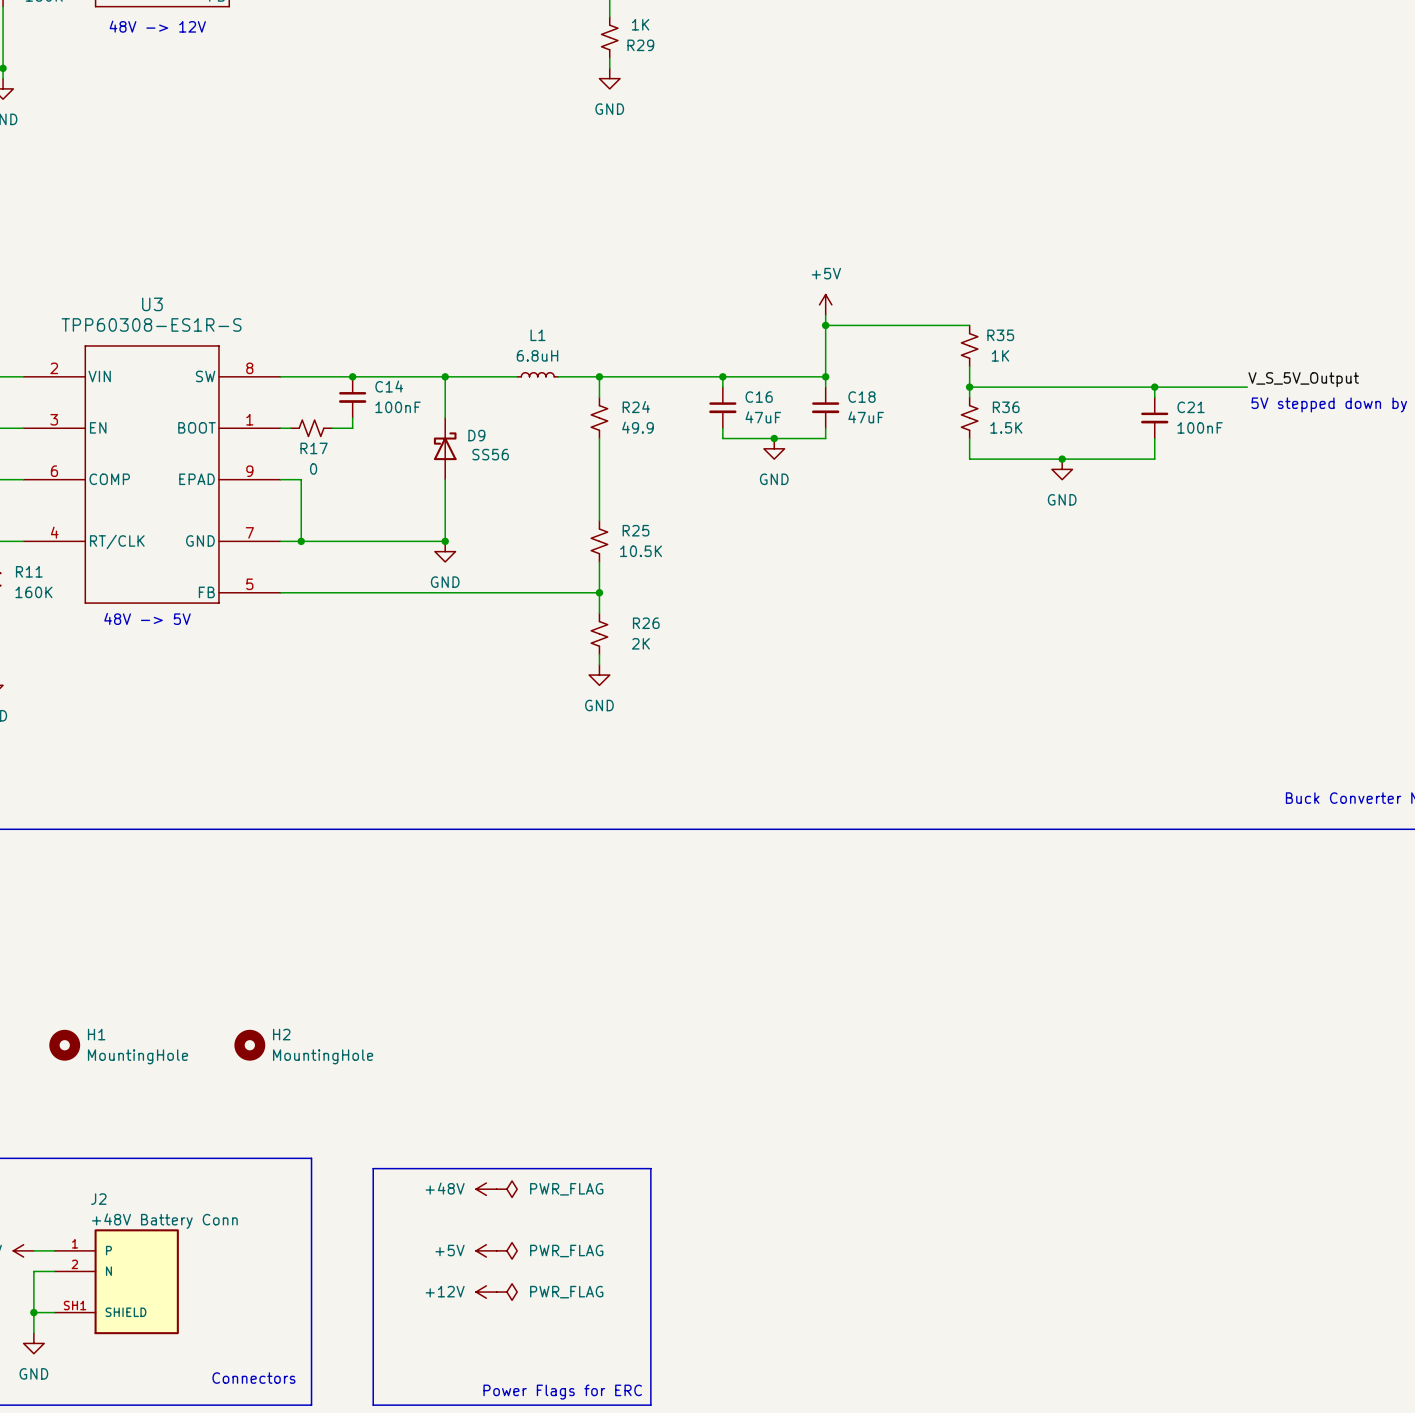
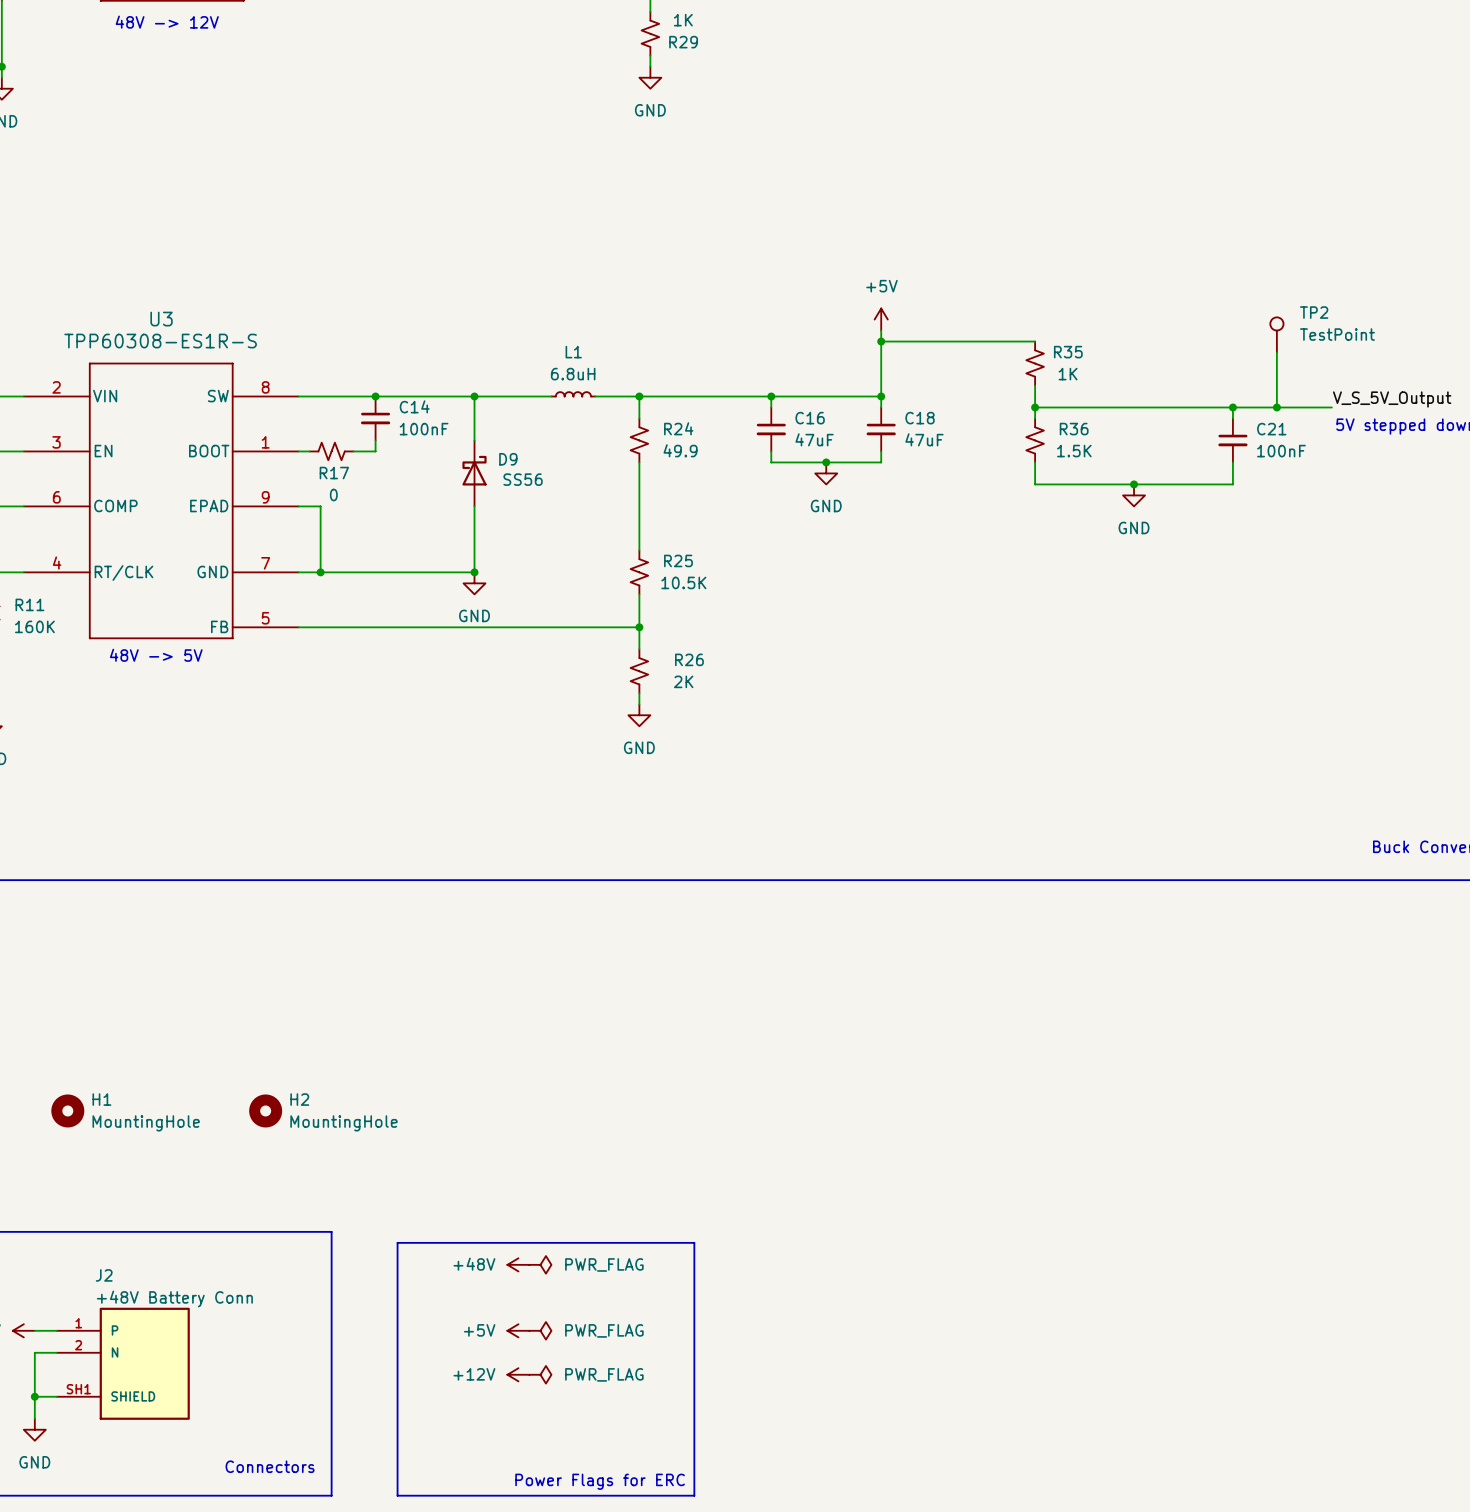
TP2: none -> TestPoint (1276, 334)
wire: none -> (1276, 352) (1276, 407)
junction: none -> (1276, 407)

